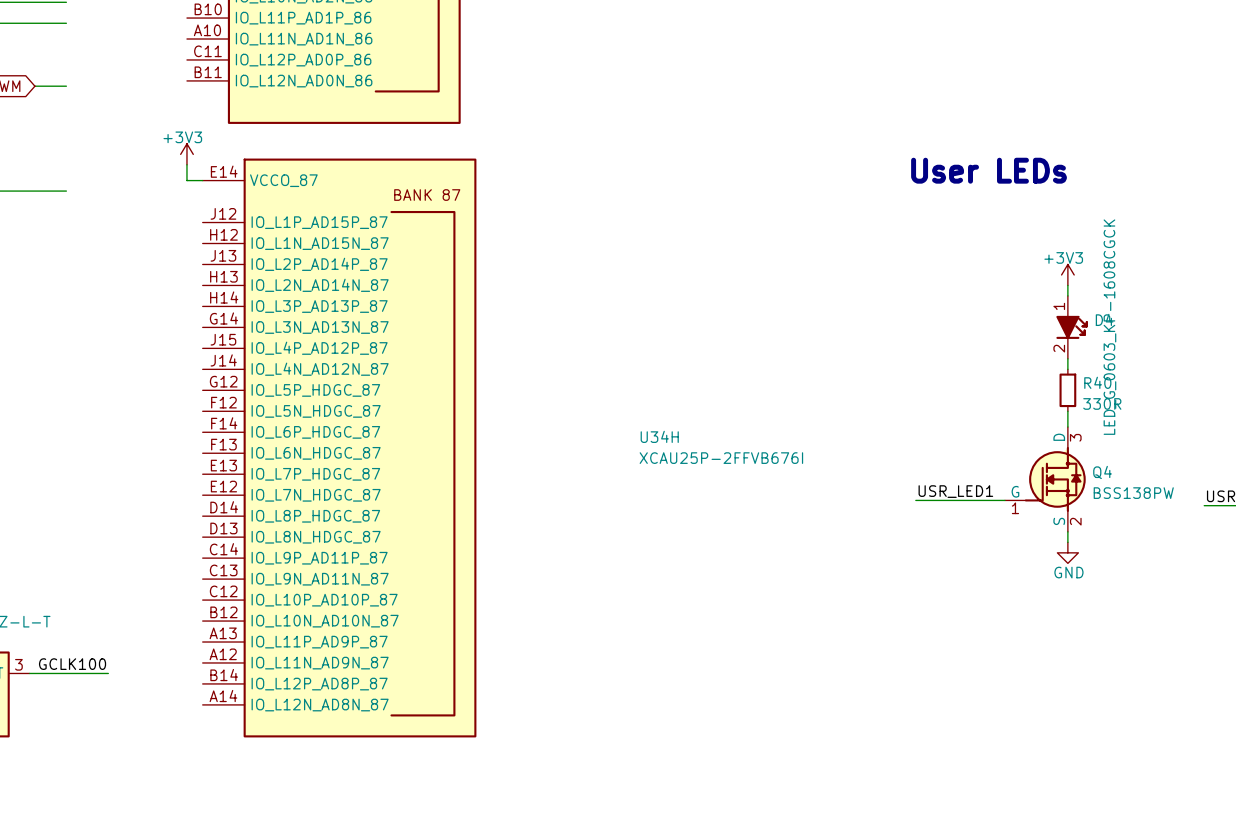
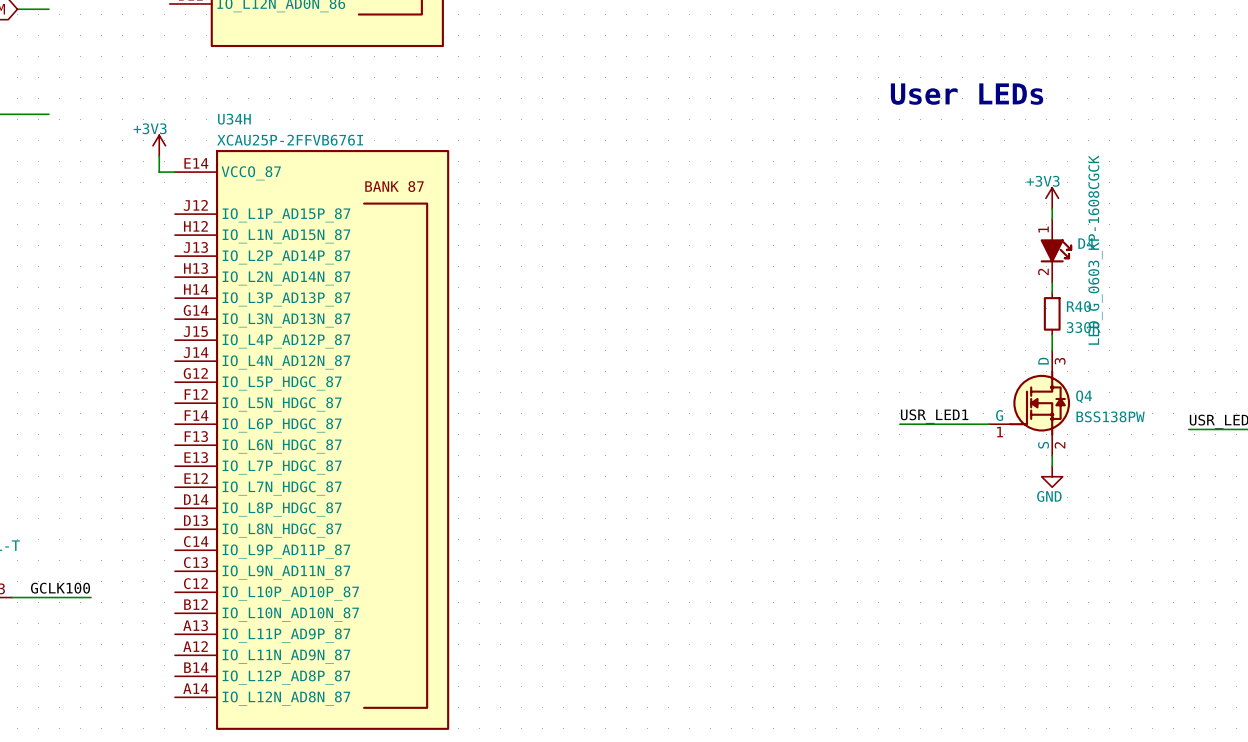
power symbol position: +3V3 (186, 154) -> +3V3 (159, 145)
wire: (186, 164) (186, 180) (202, 180) -> (159, 156) (159, 172) (175, 172)
U34H name position: U34H (659, 436) -> U34H (234, 119)
U34H position: (339, 447) -> (312, 439)
U34H text position: XCAU25P-2FFVB676I (721, 458) -> XCAU25P-2FFVB676I (290, 140)

